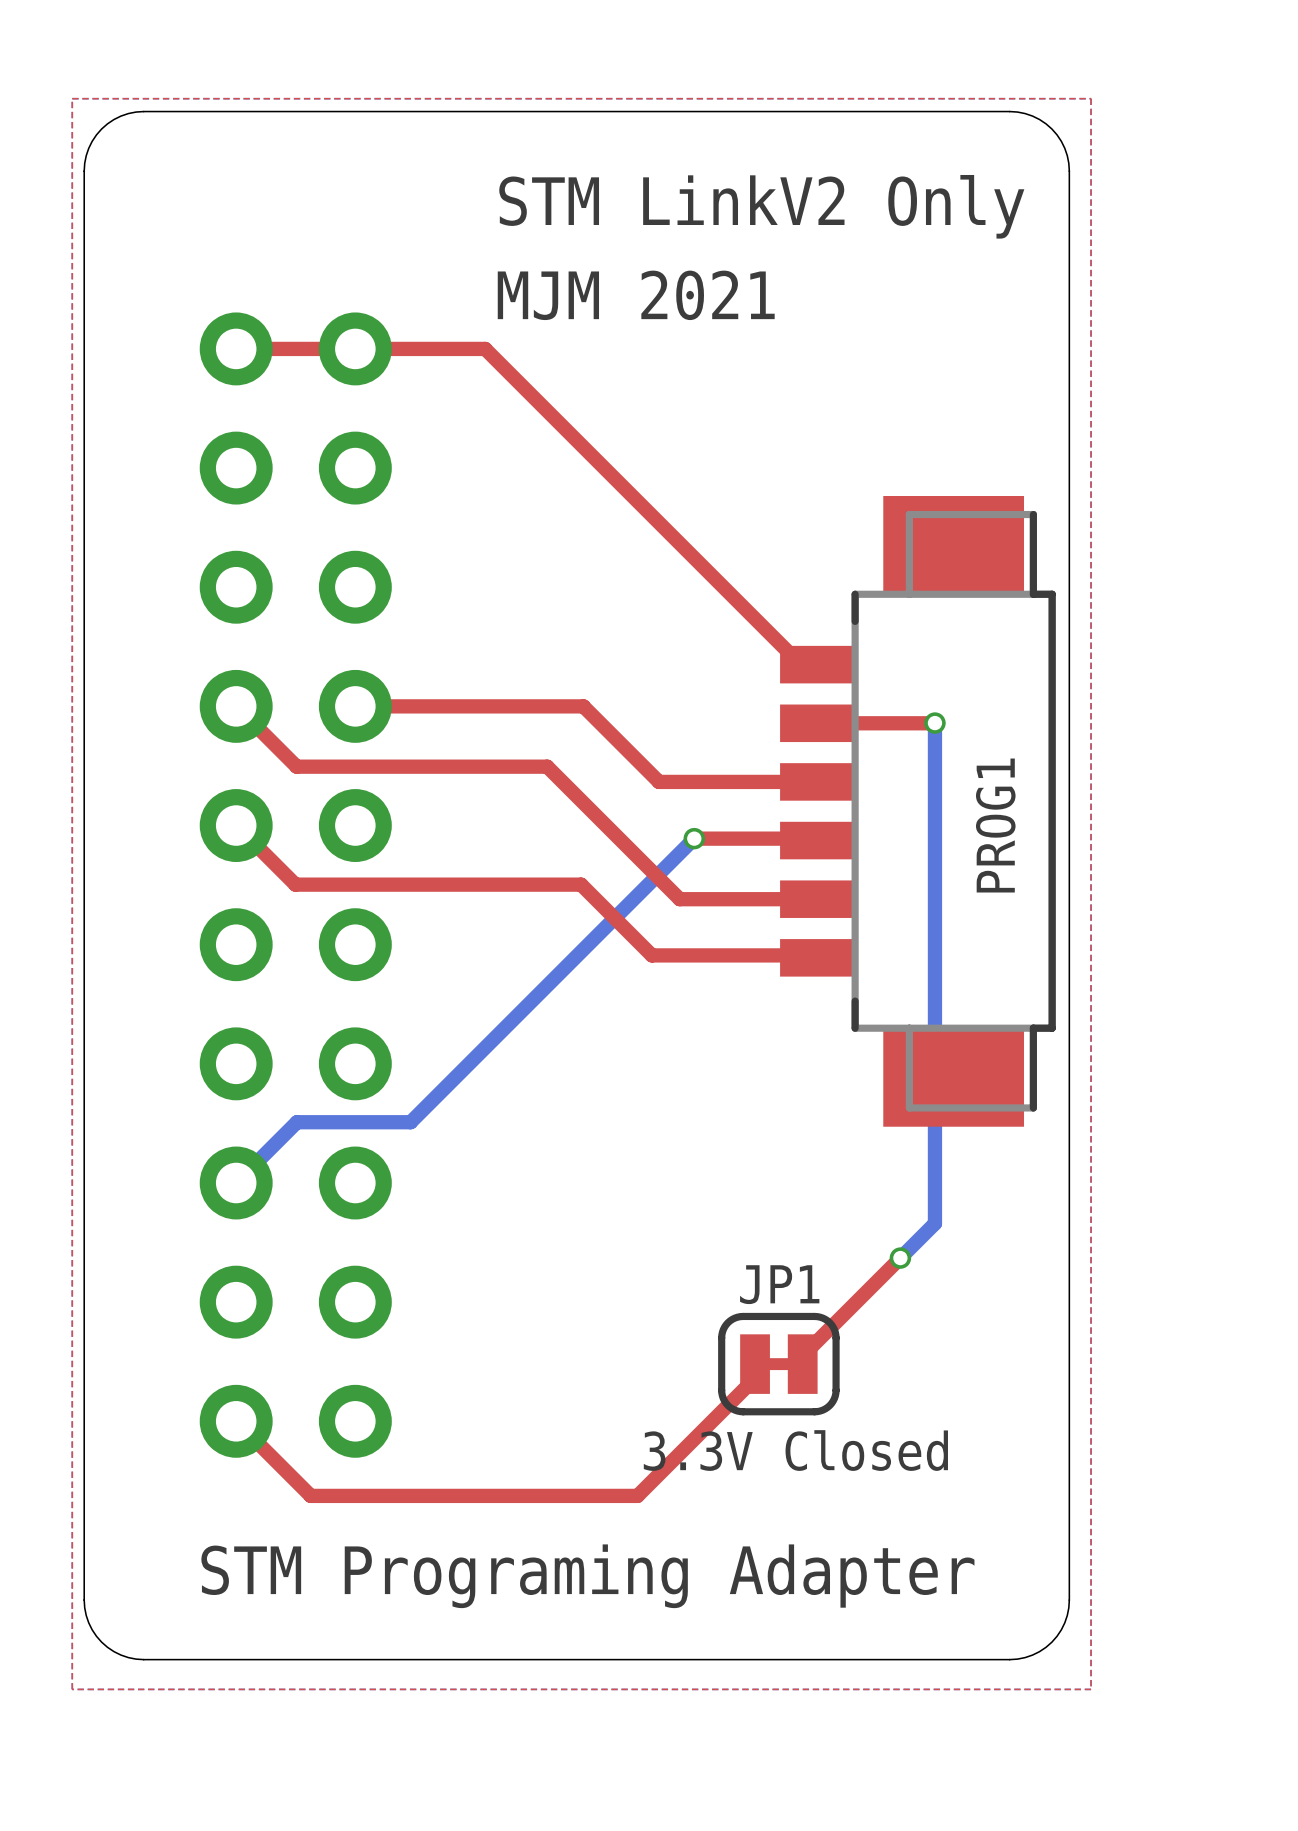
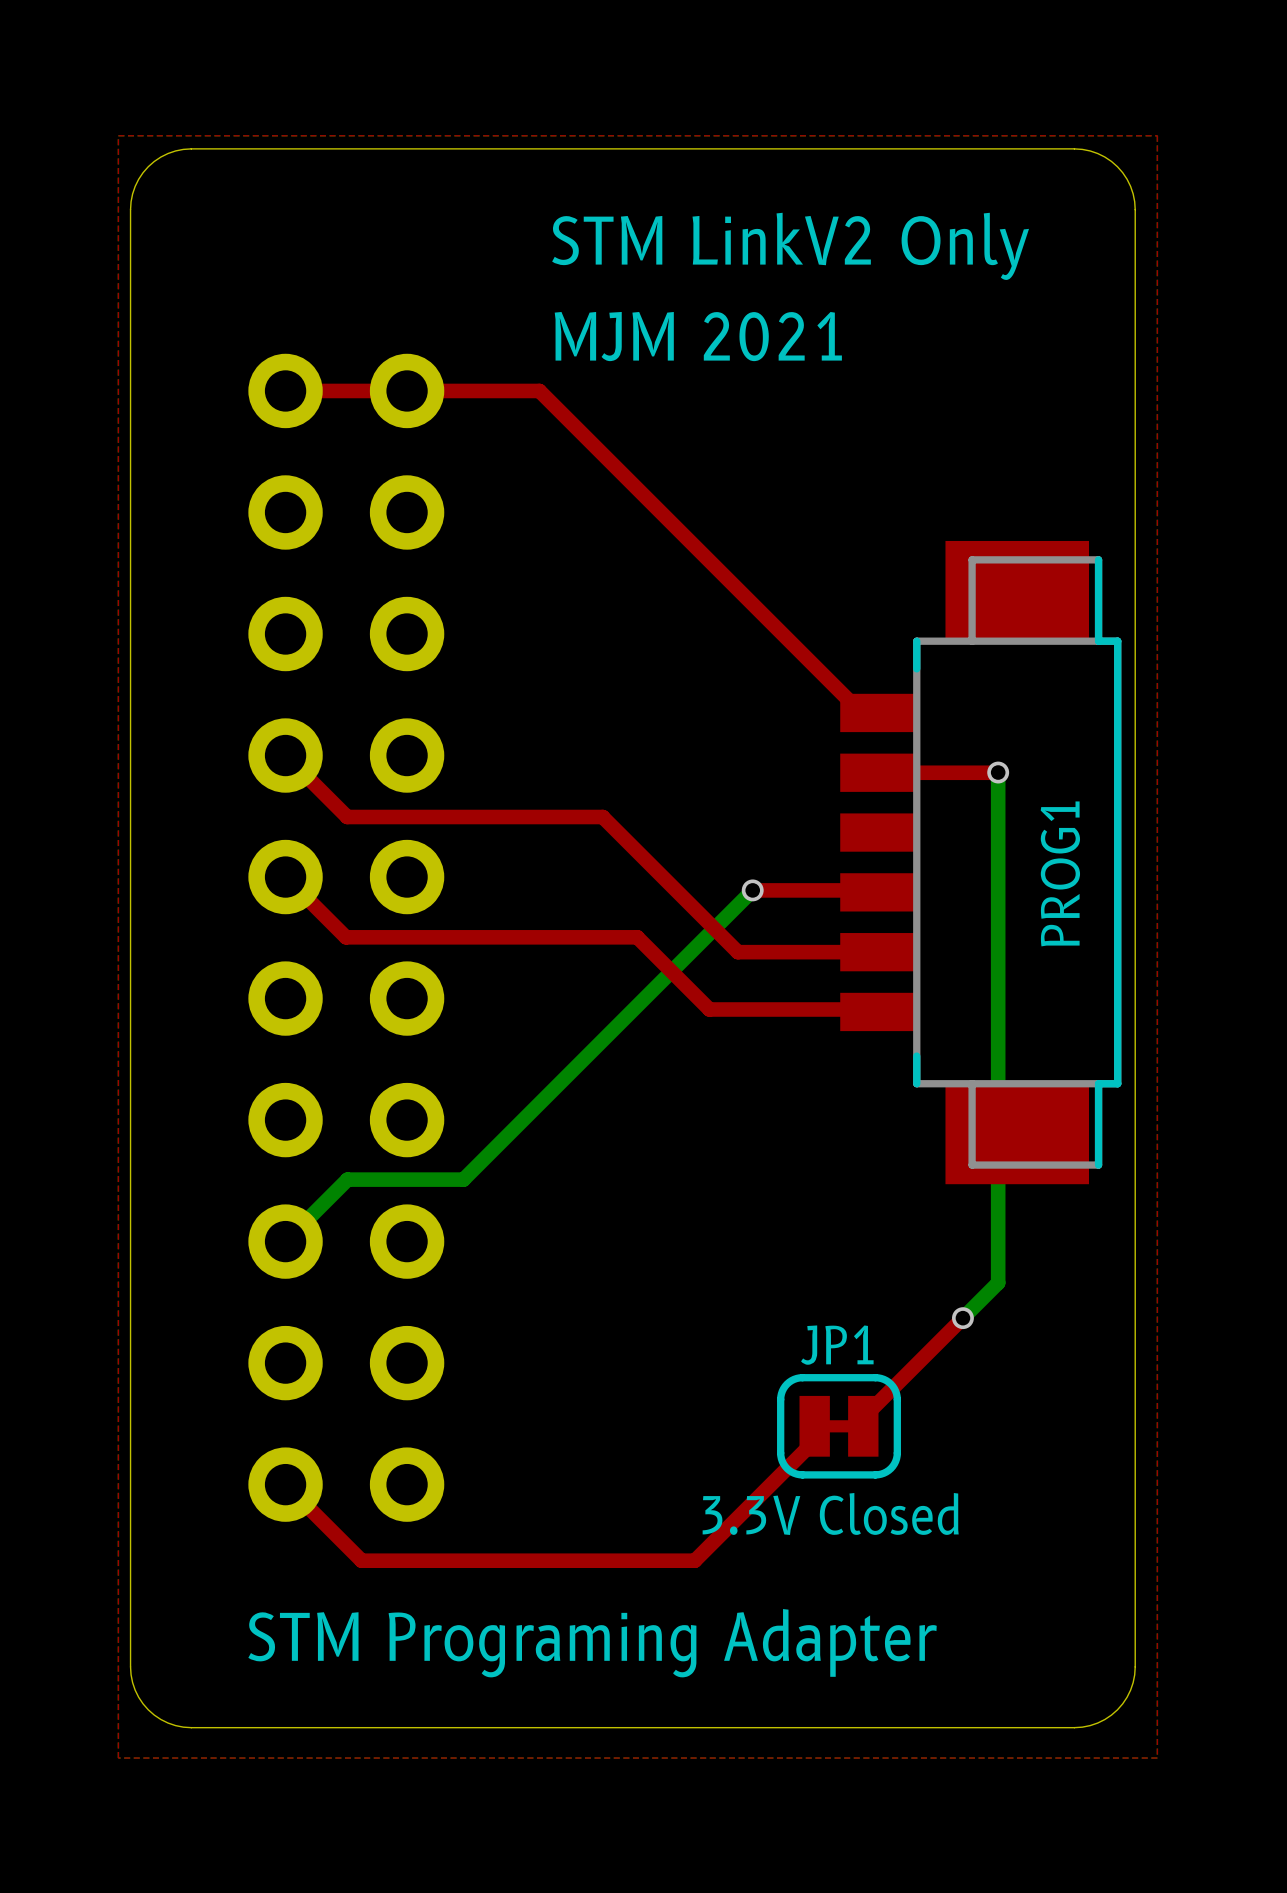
top track: (360, 706) (583, 706) (658, 781) (817, 781) -> none

